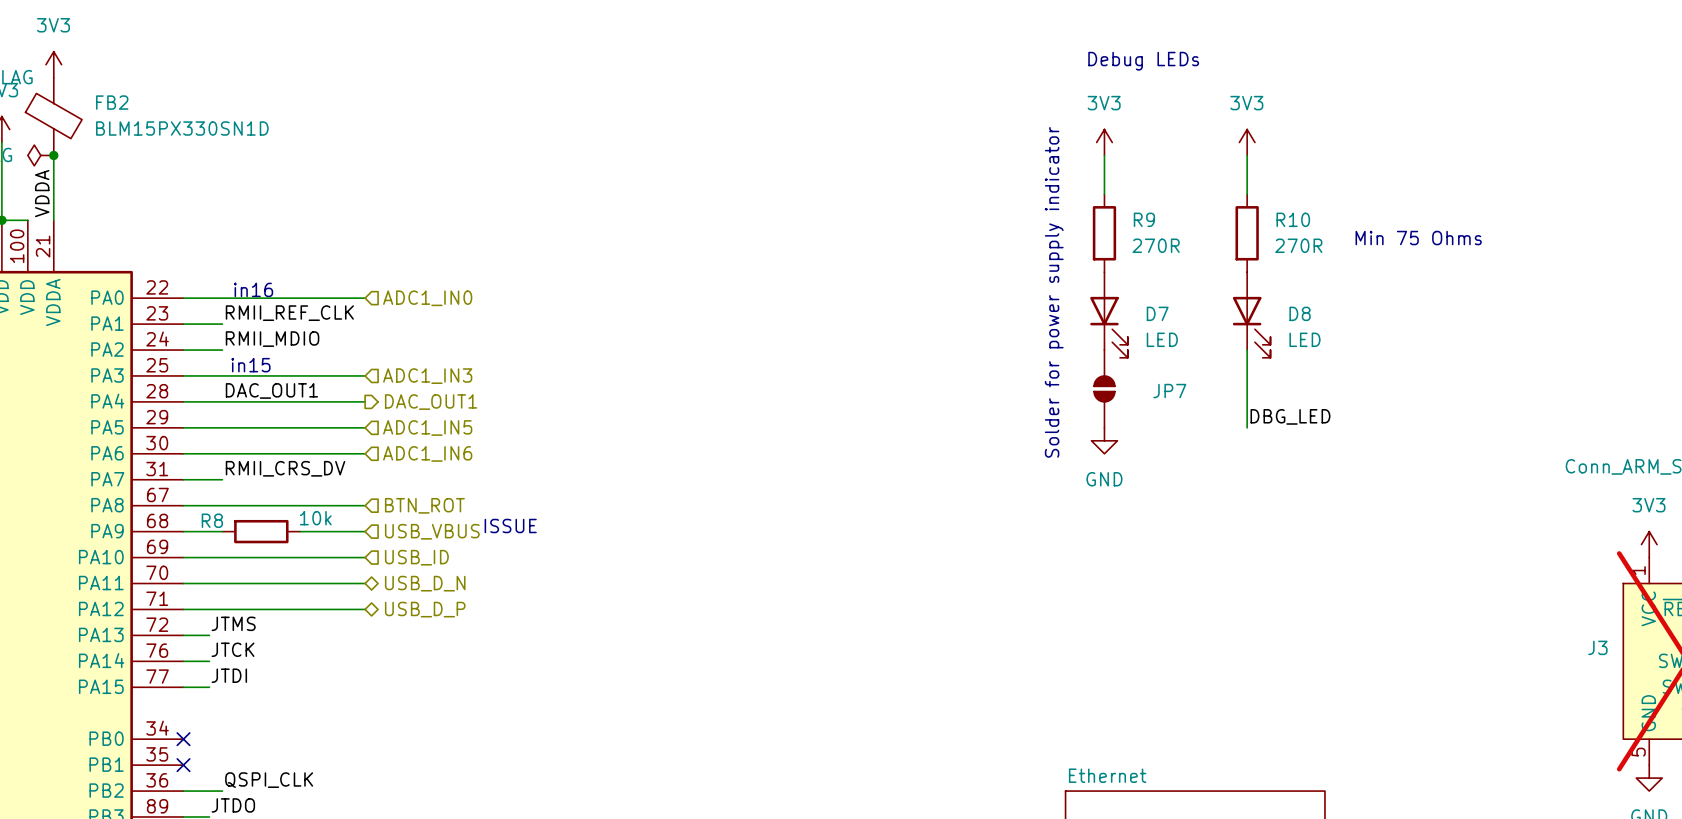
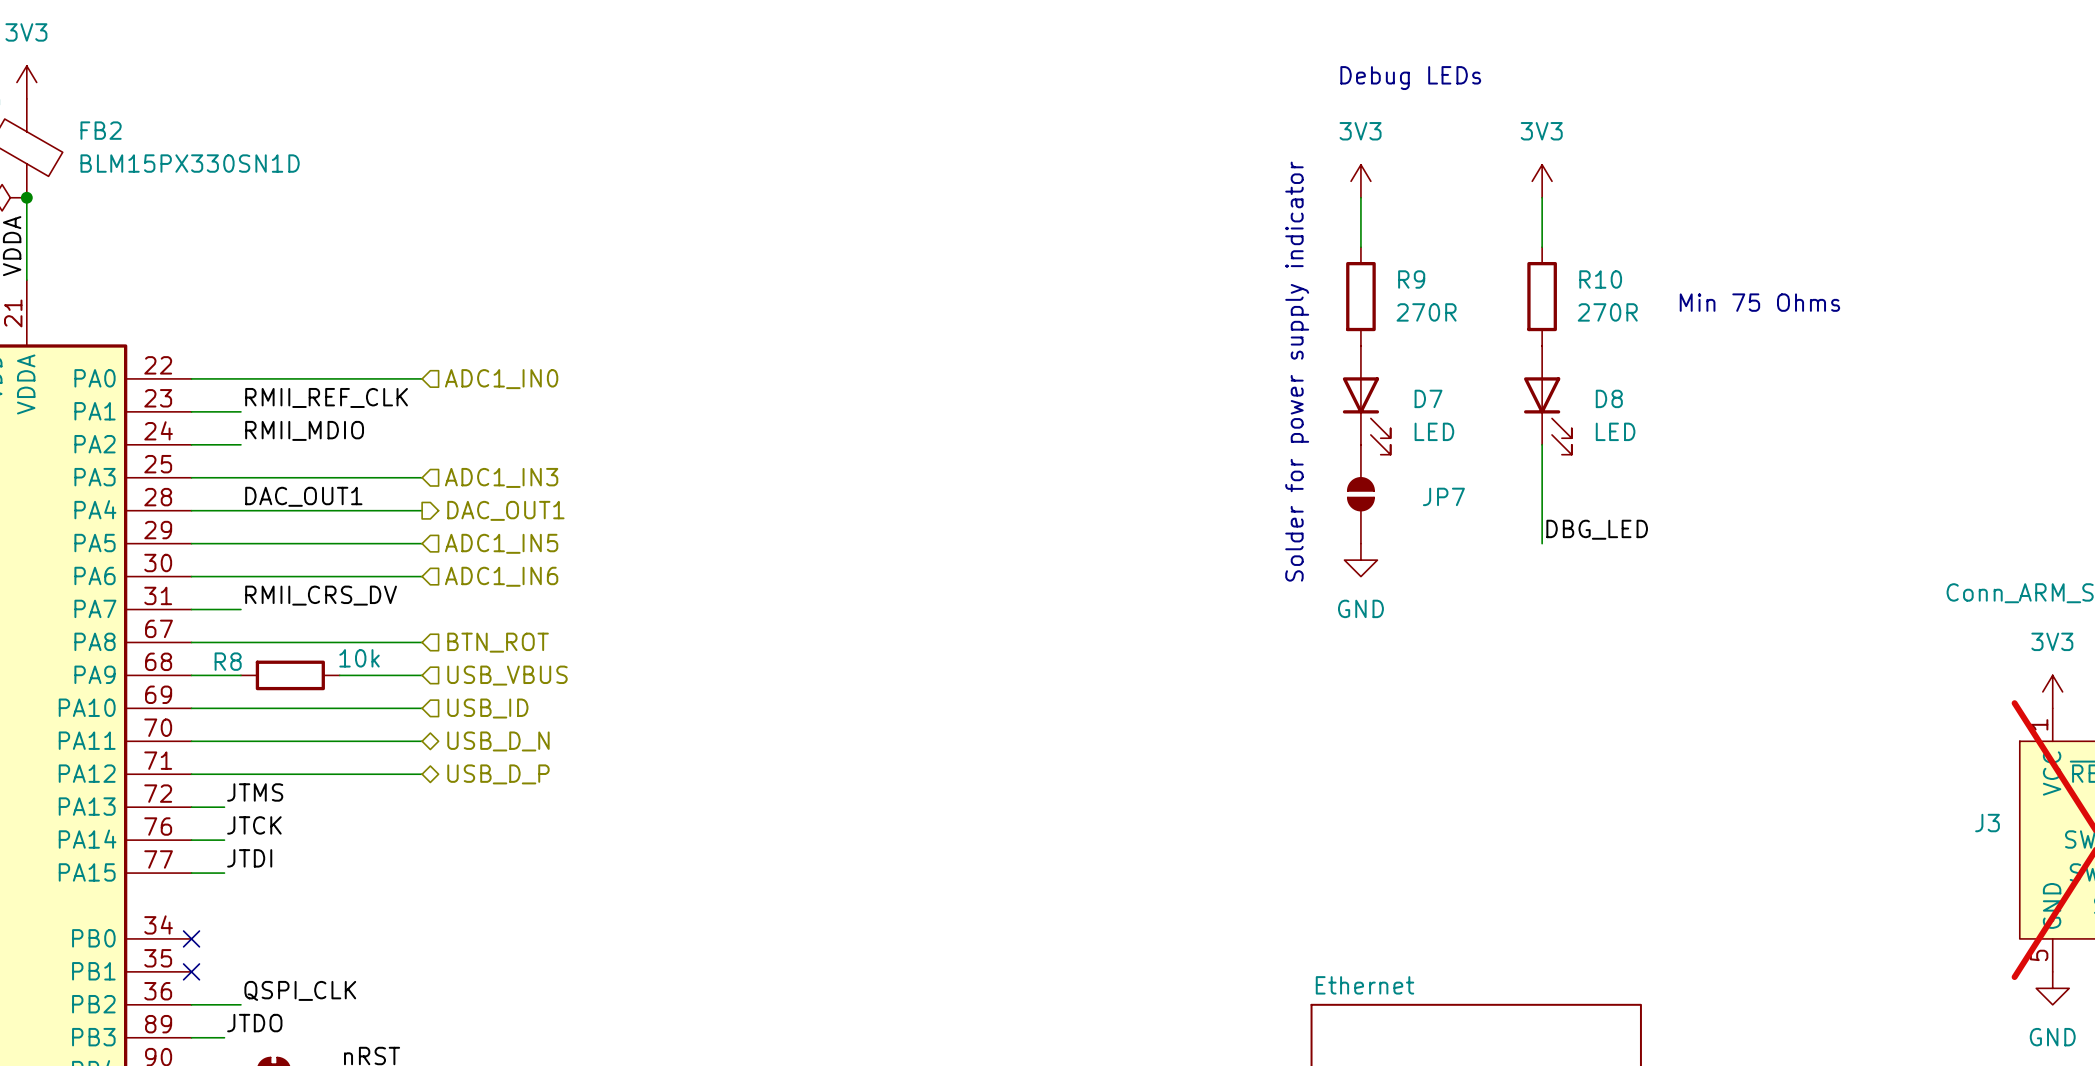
text: in16 (253, 289) -> none
text: in15 (250, 365) -> none
text: ISSUE (510, 525) -> none

